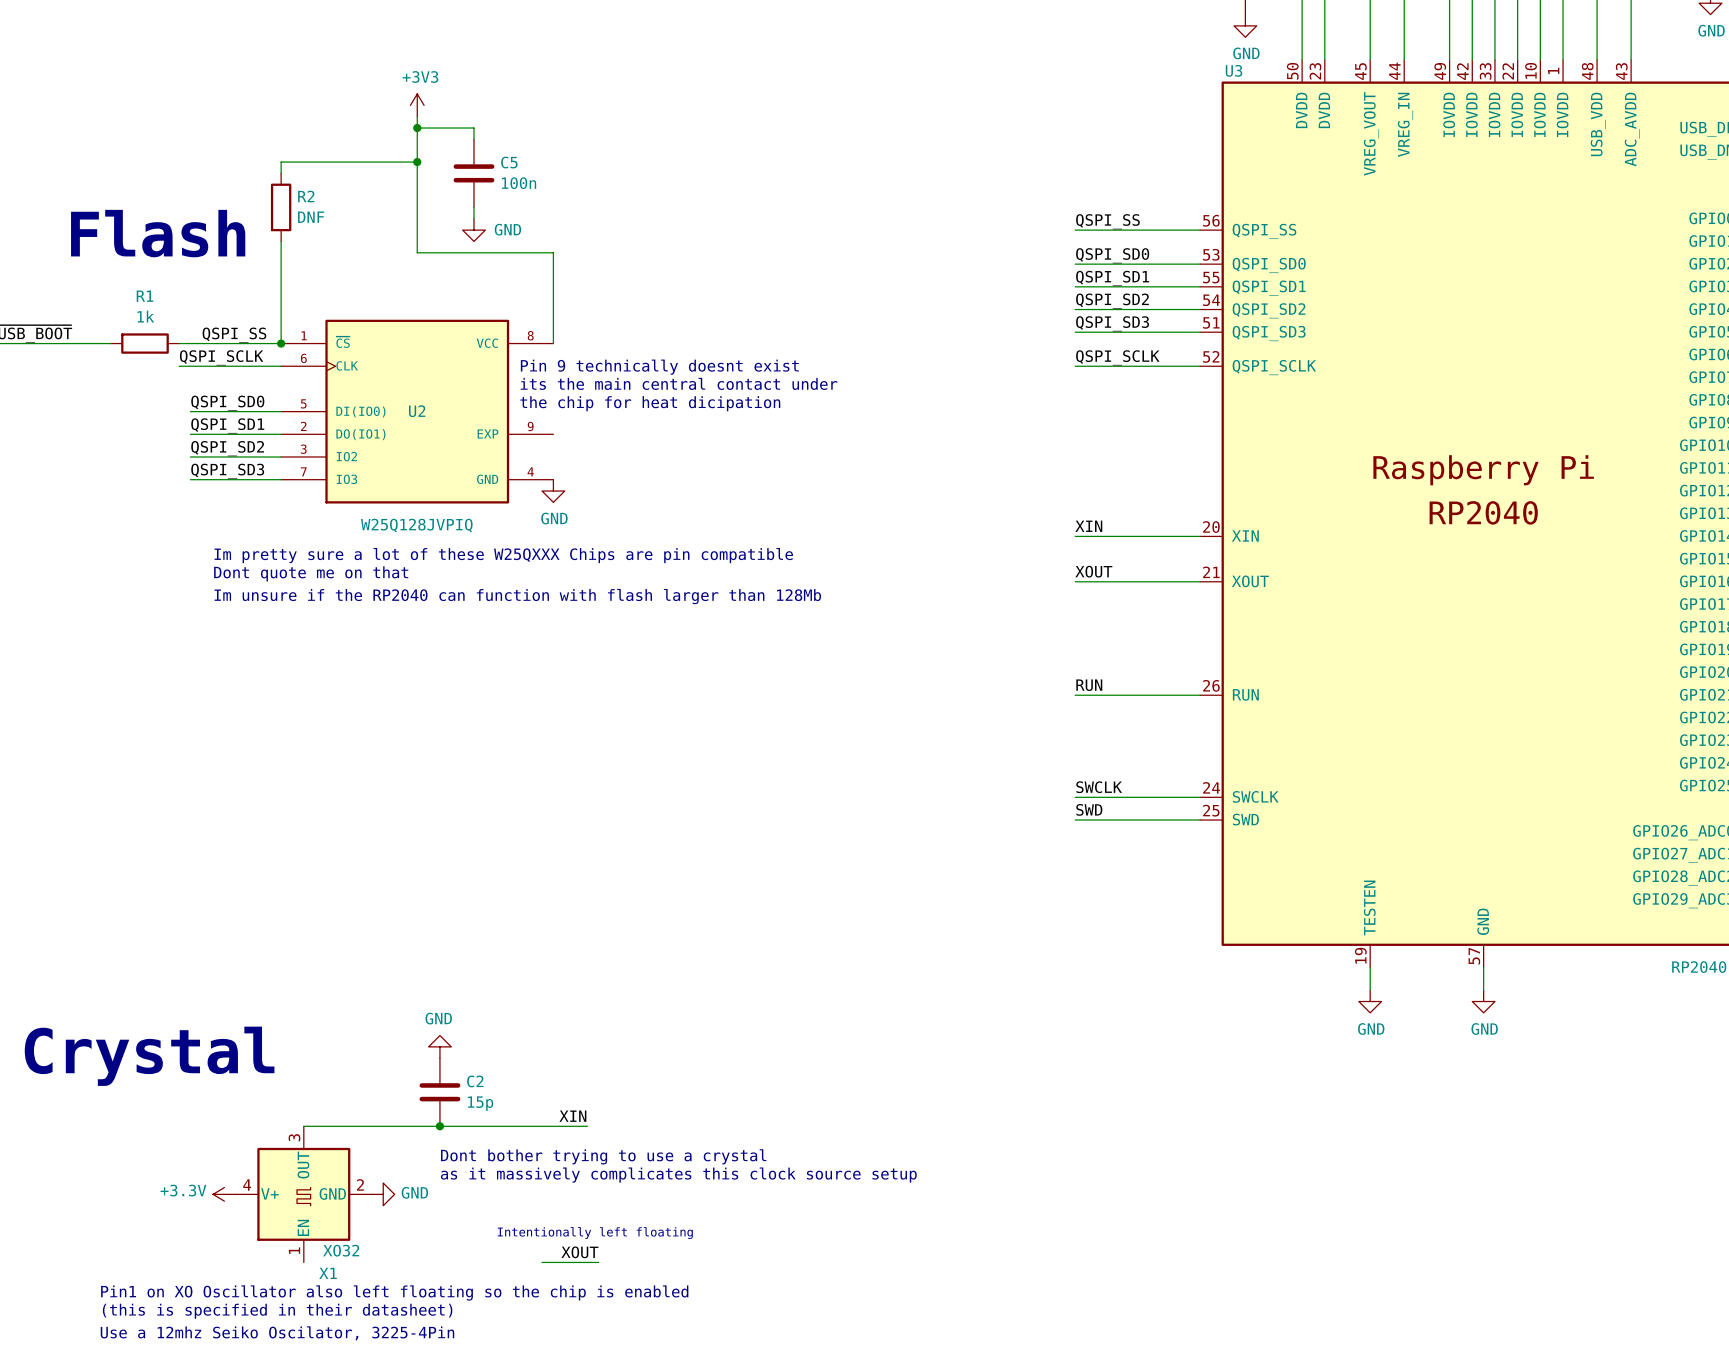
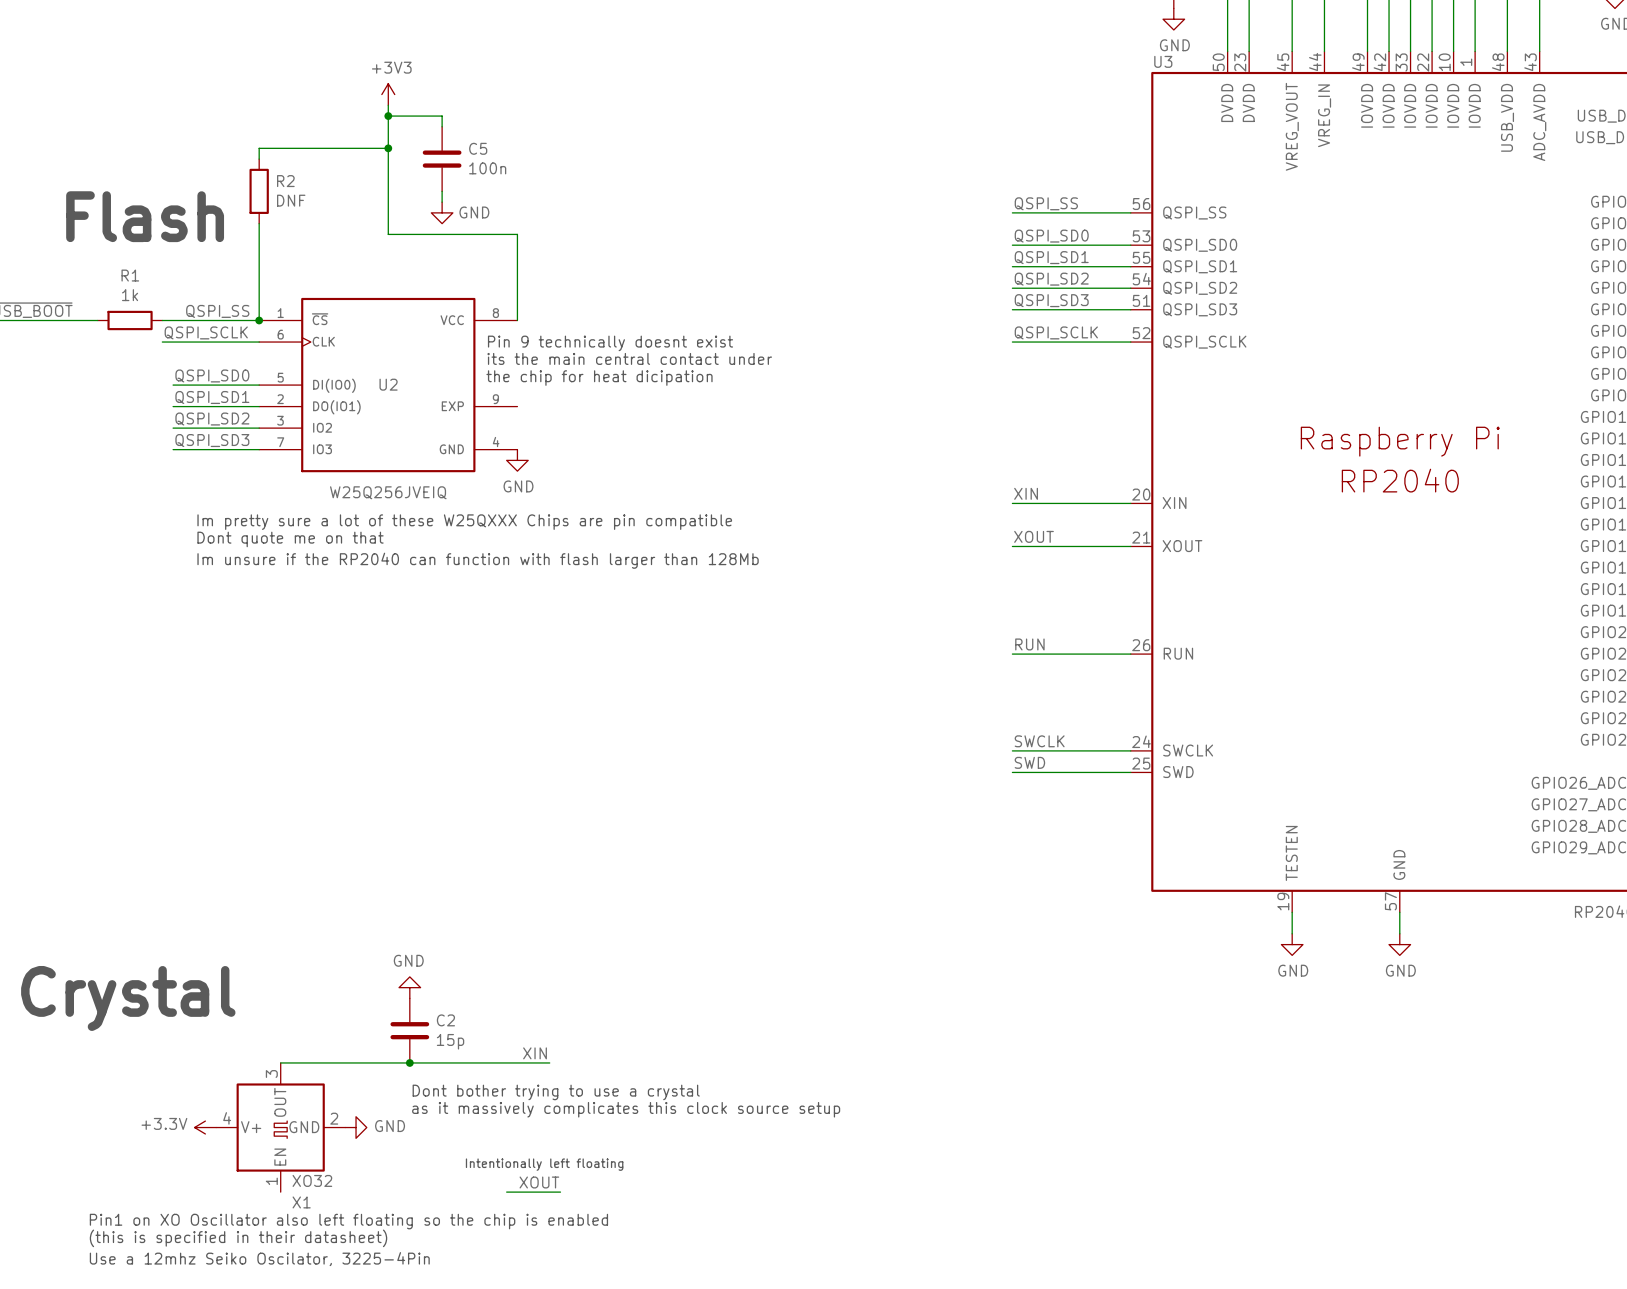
U2 value: W25Q128JVPIQ (416, 525) -> W25Q256JVEIQ (388, 492)

